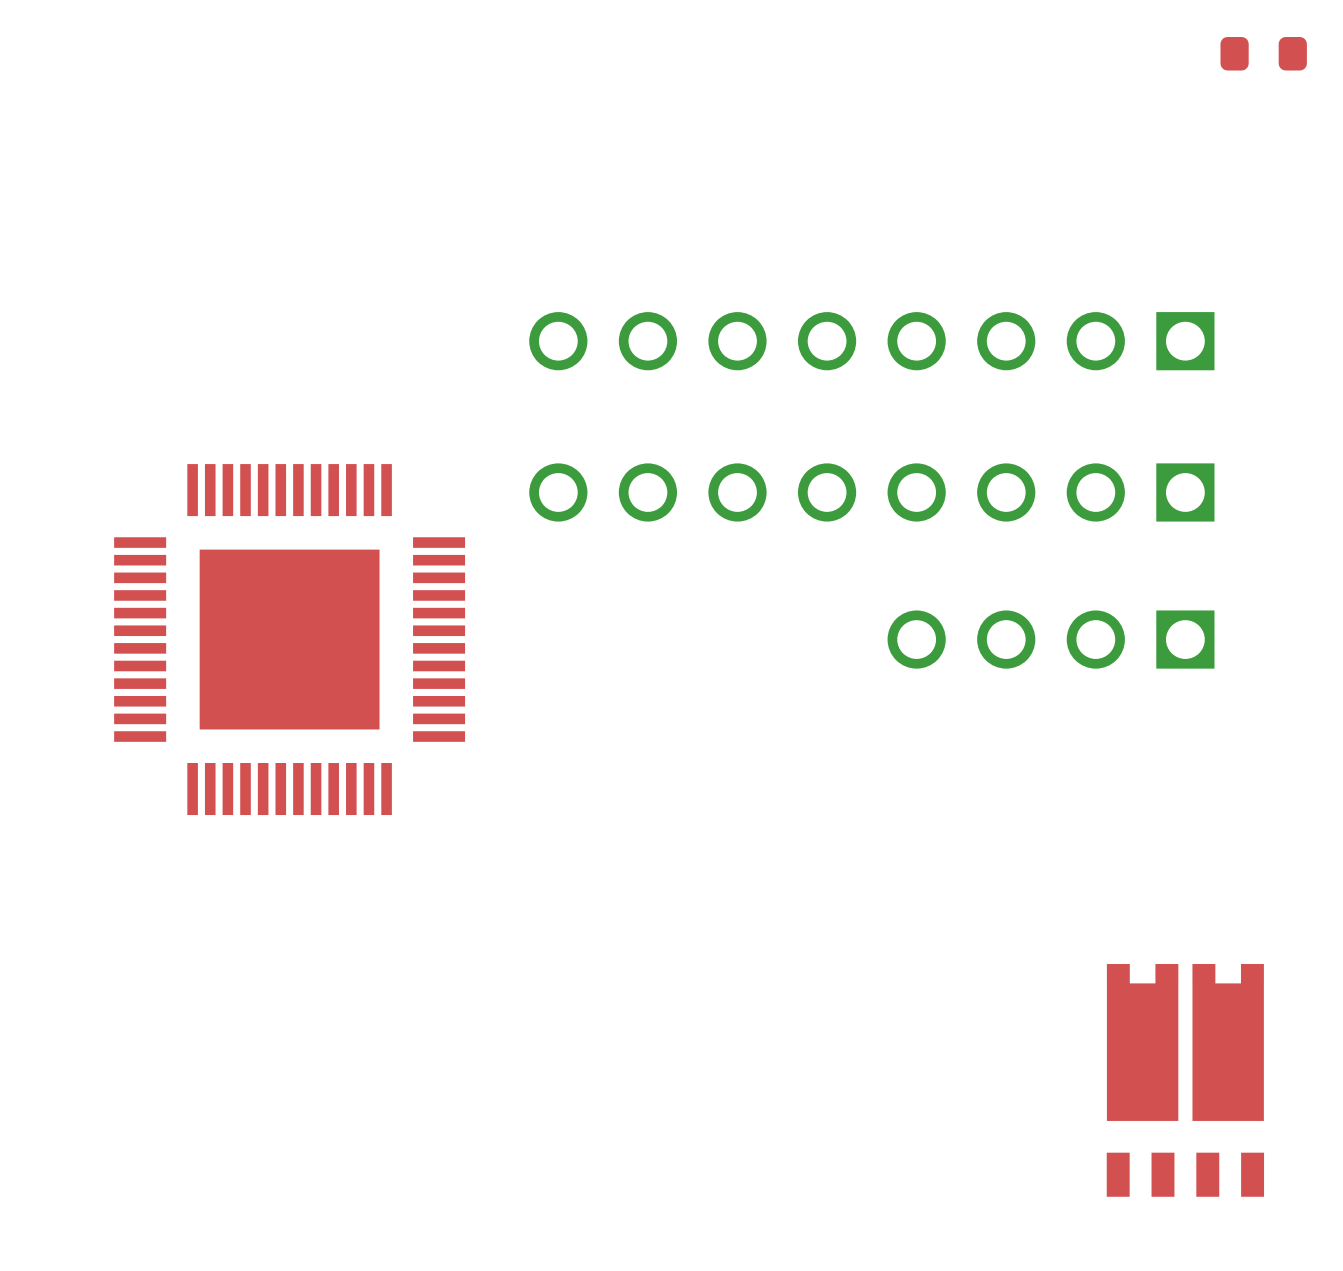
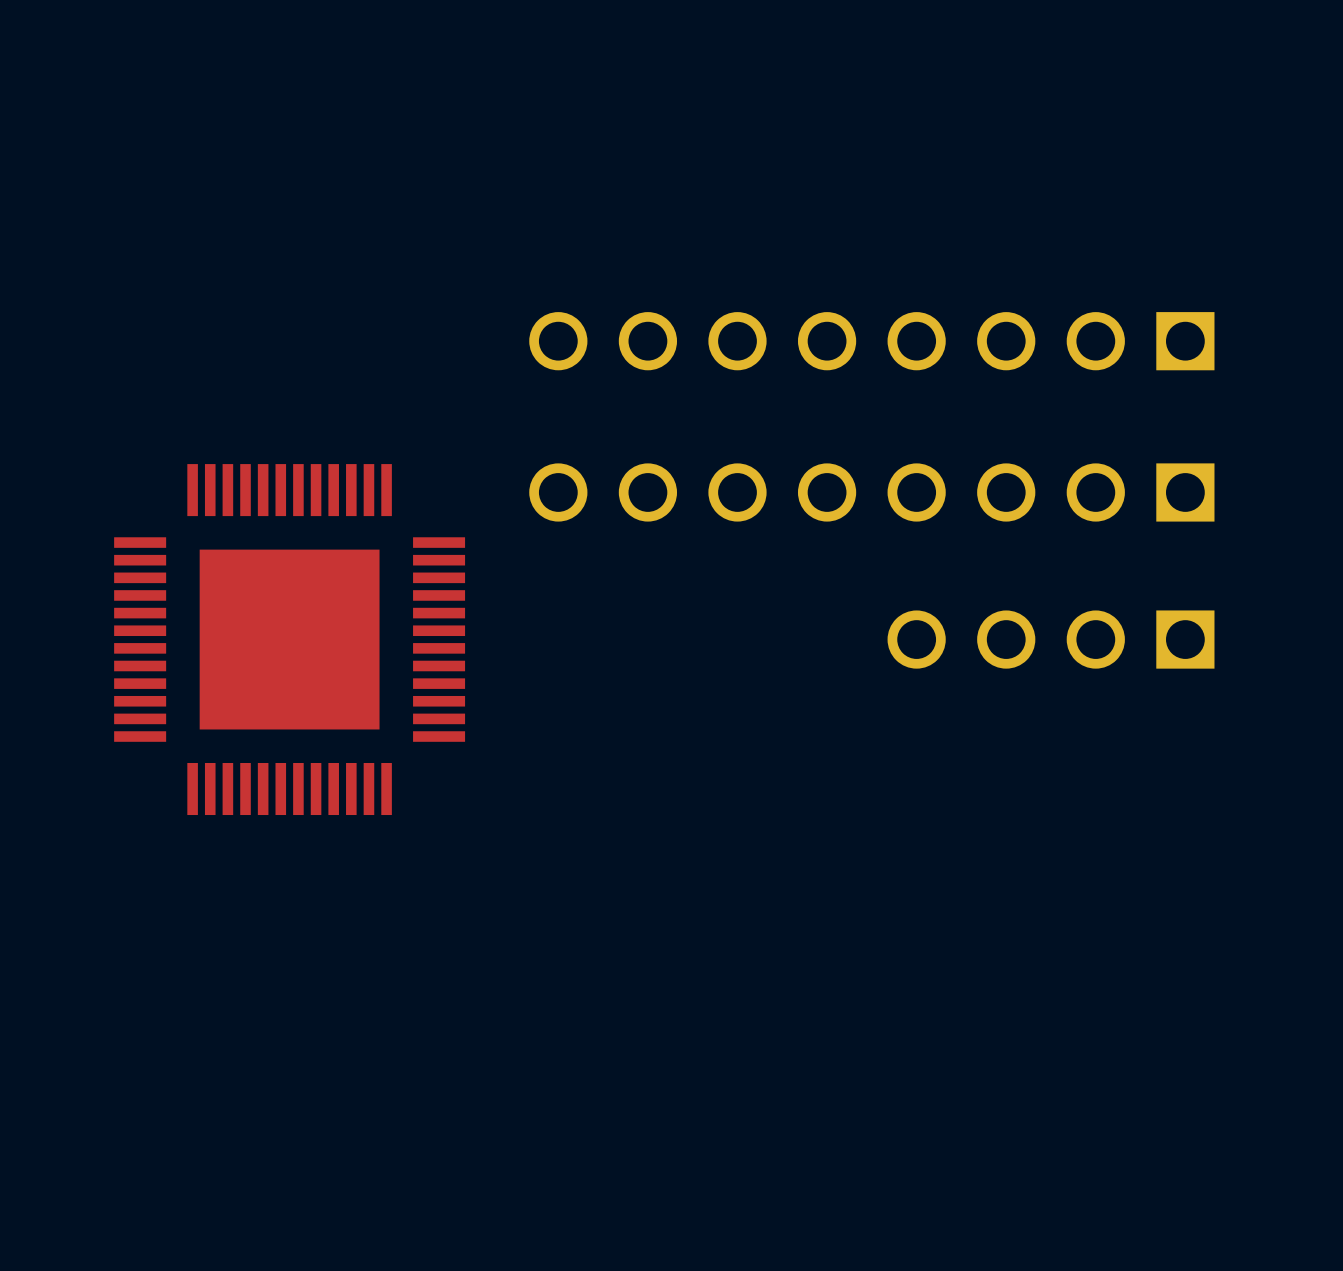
part: (1263, 53) -> none
part: (1185, 1080) -> none

